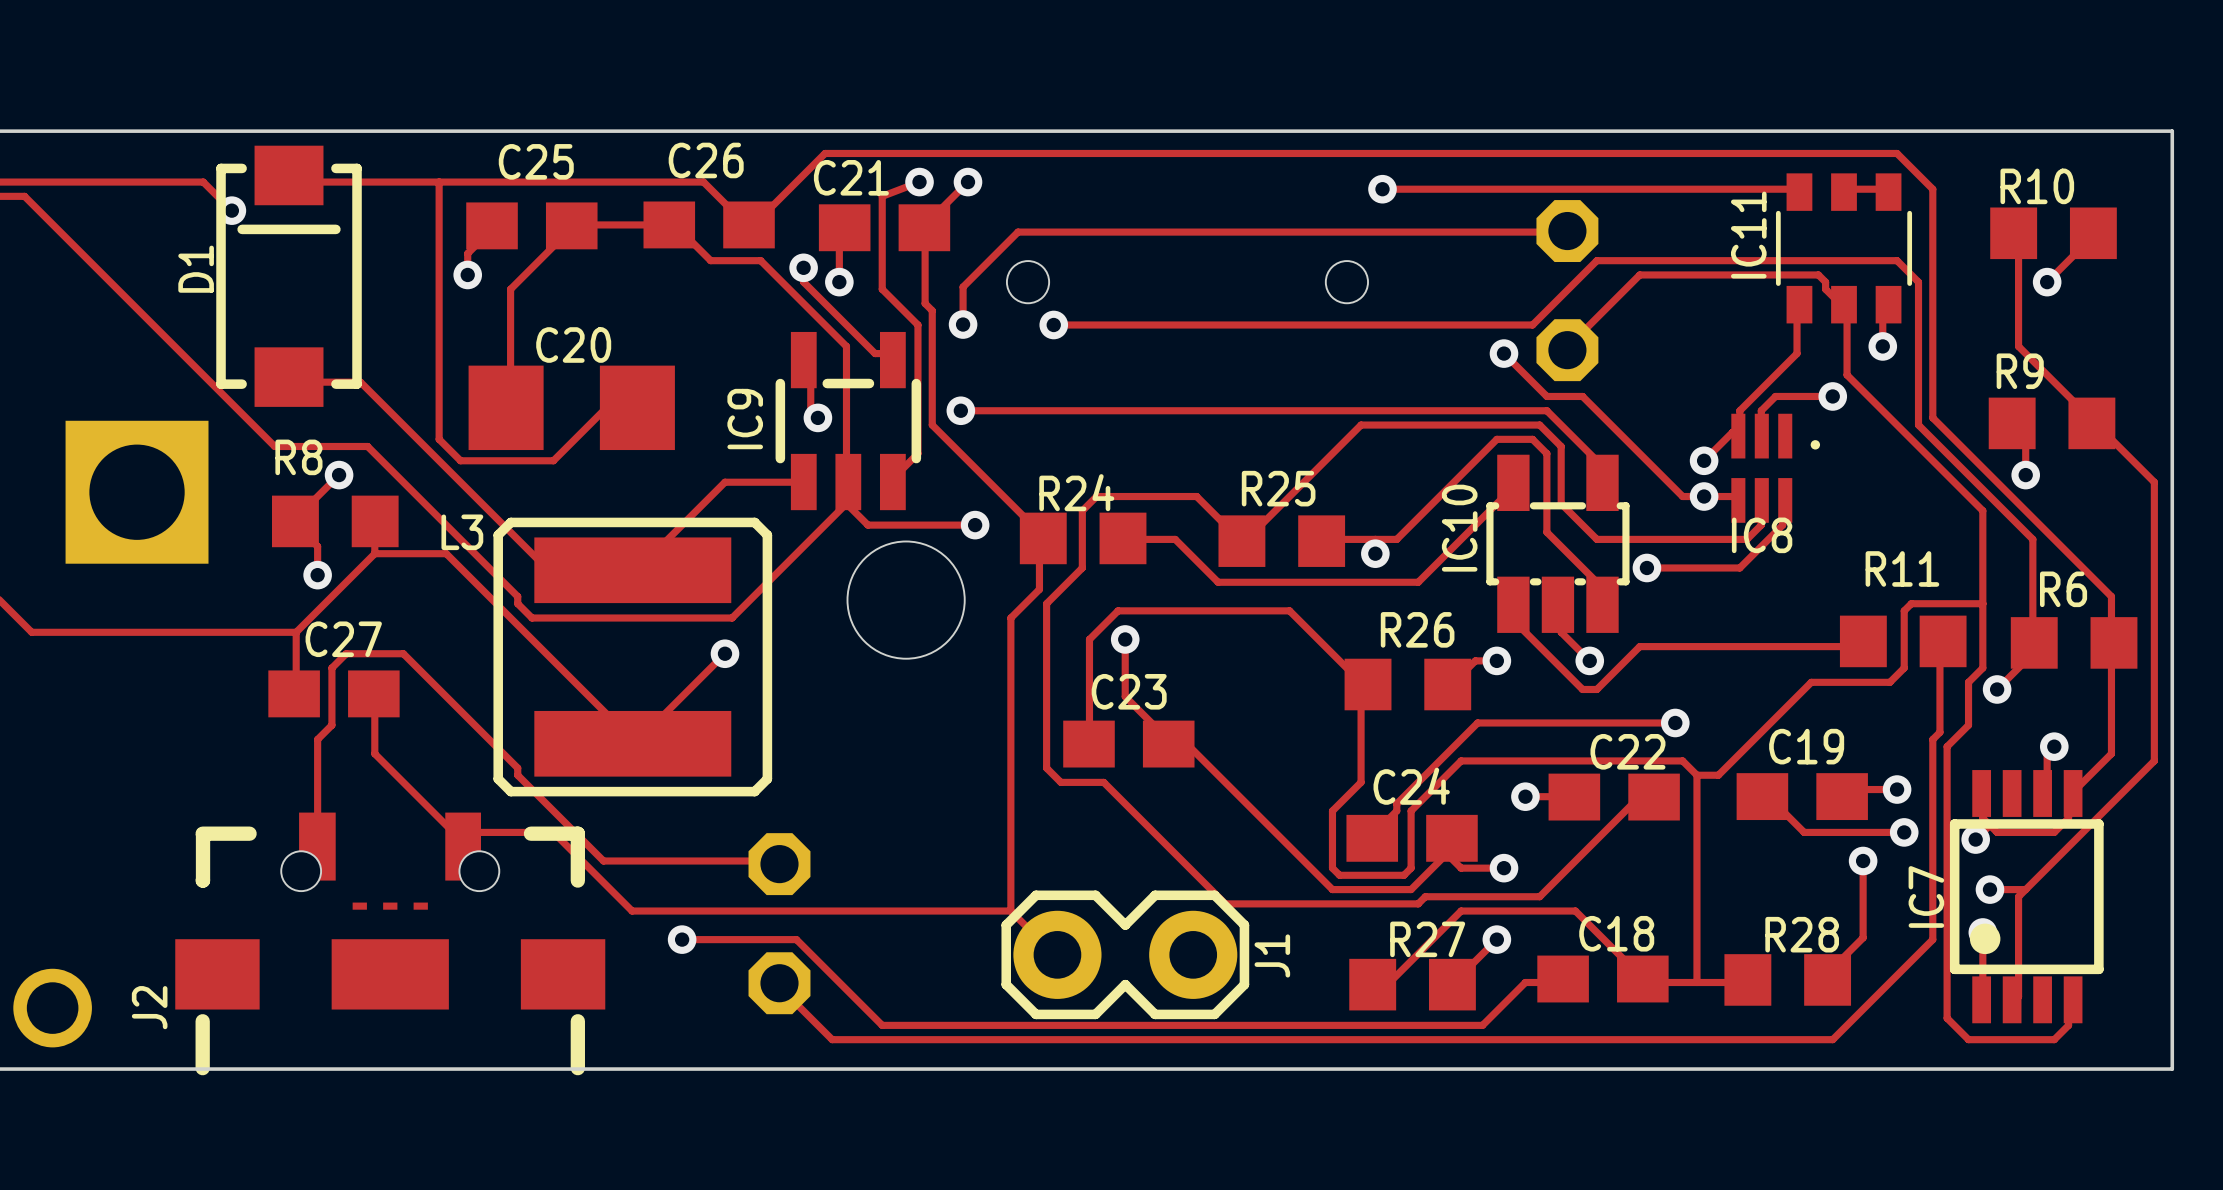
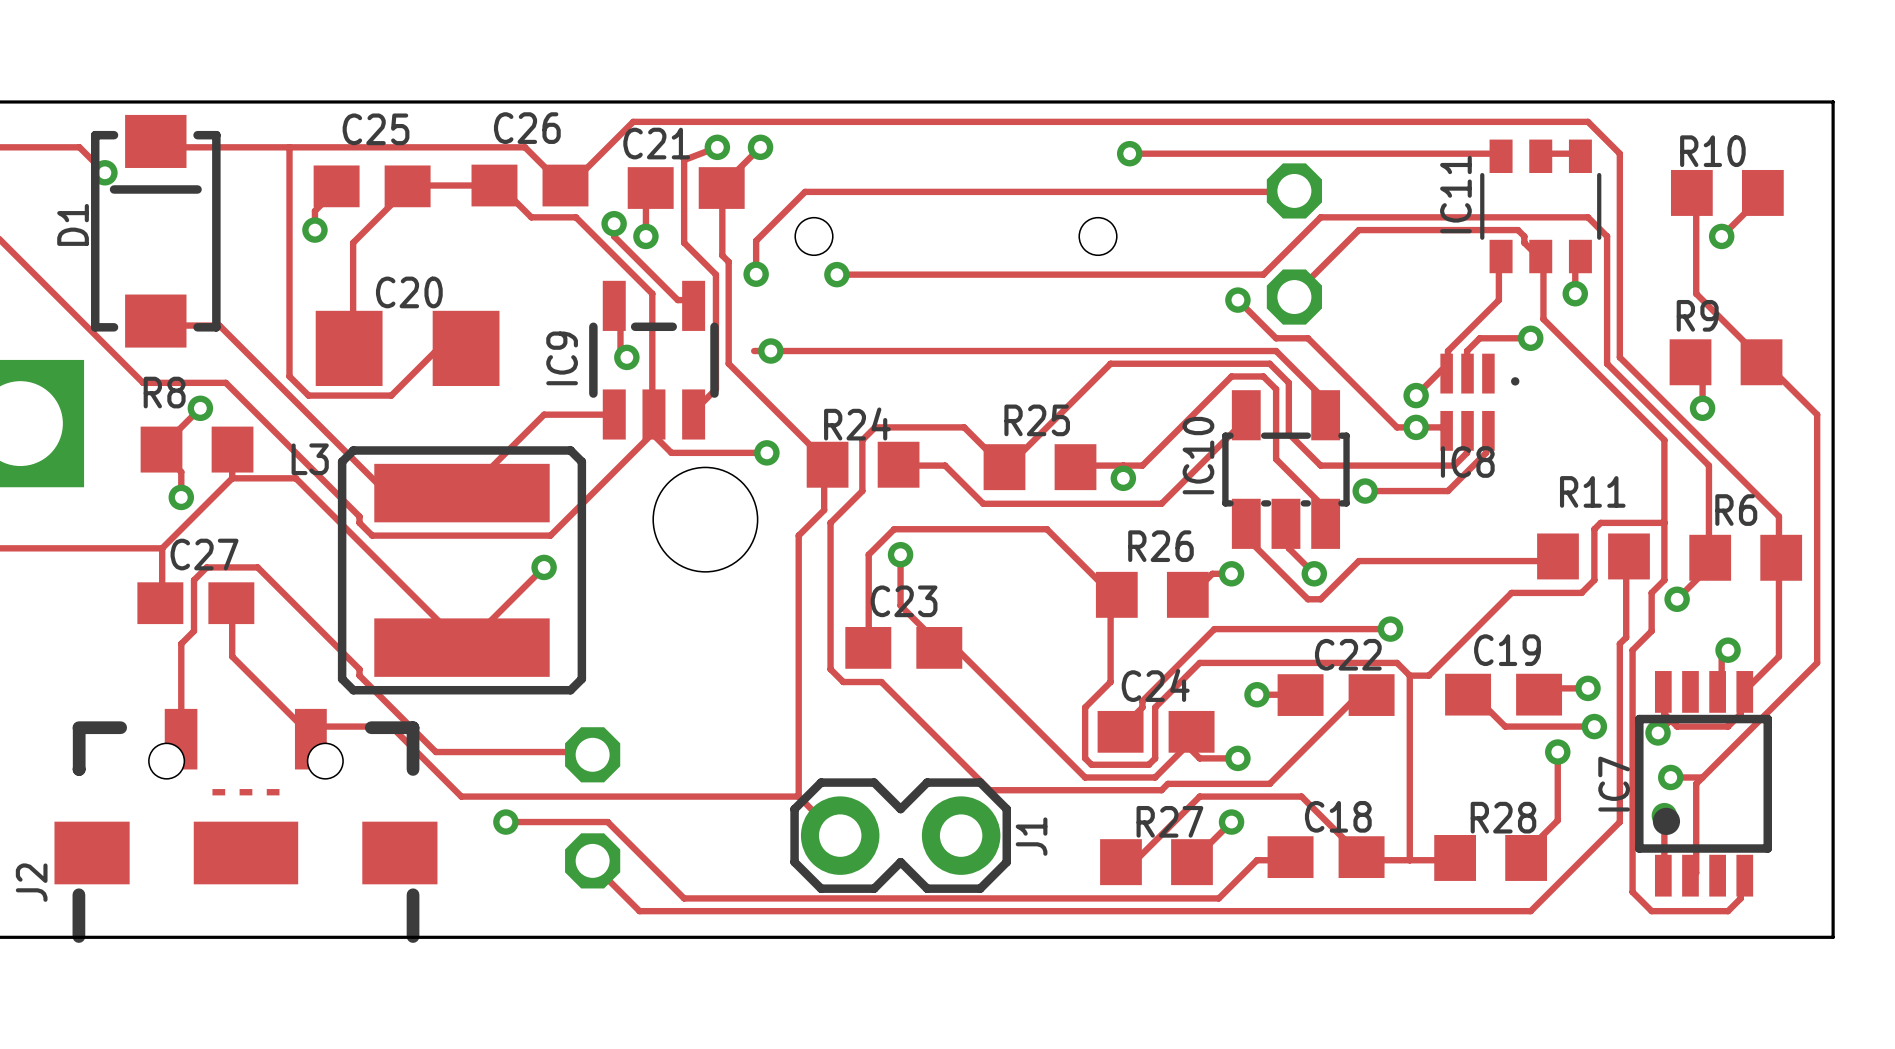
via position: (960, 410) -> (770, 351)

